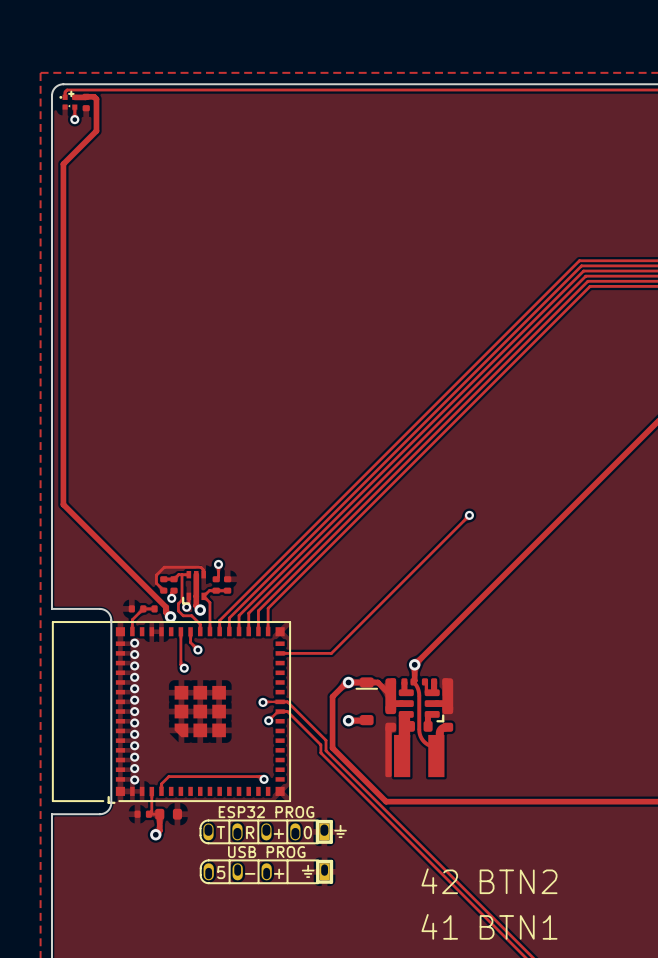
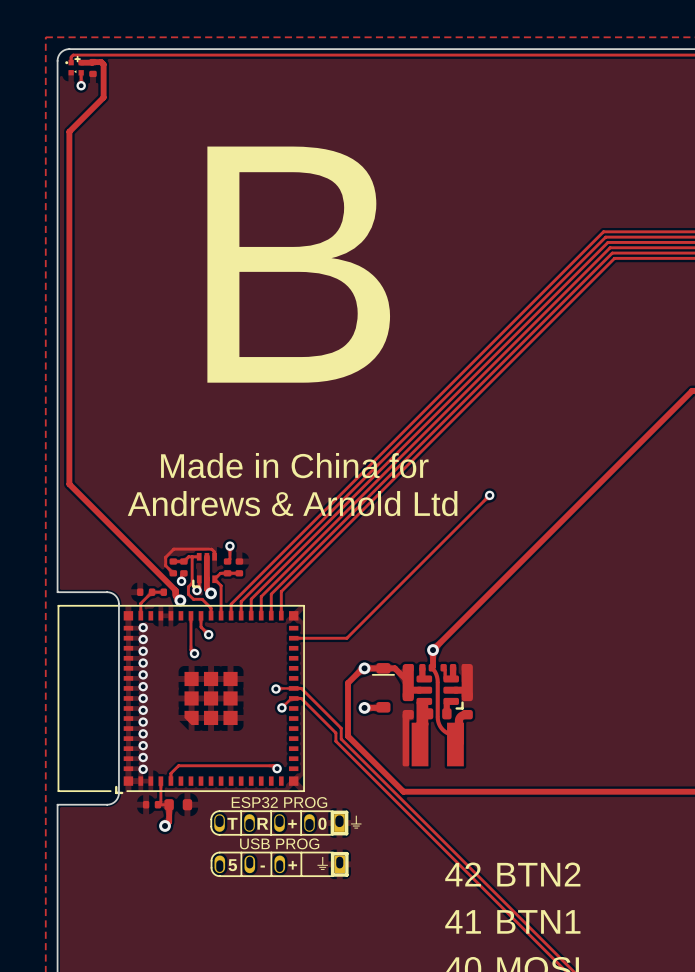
text: none -> B (298, 264)
text: none -> Made in China for (294, 465)
text: none -> Andrews & Arnold Ltd (292, 503)

